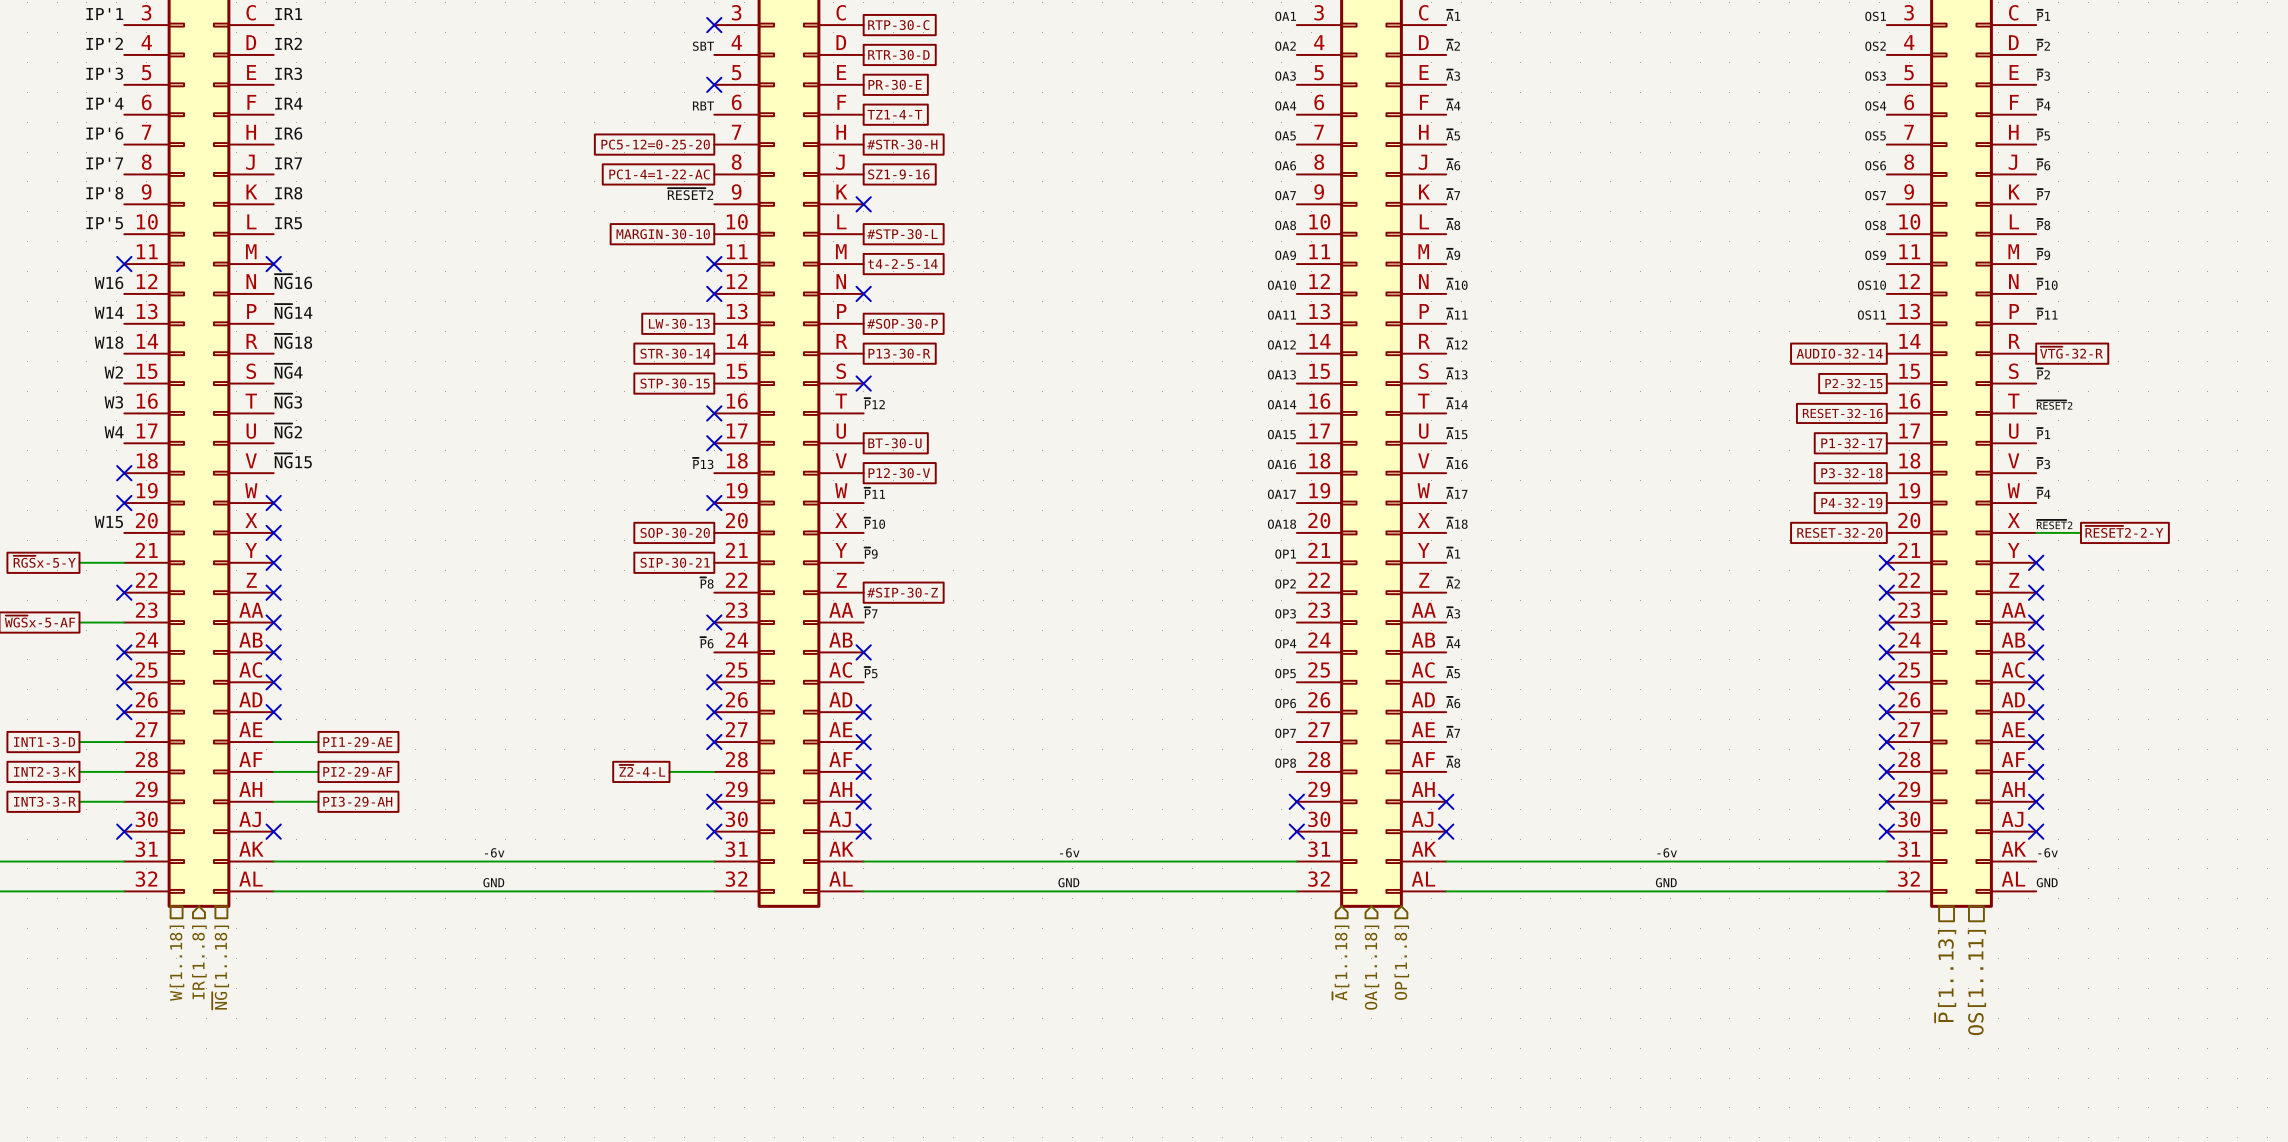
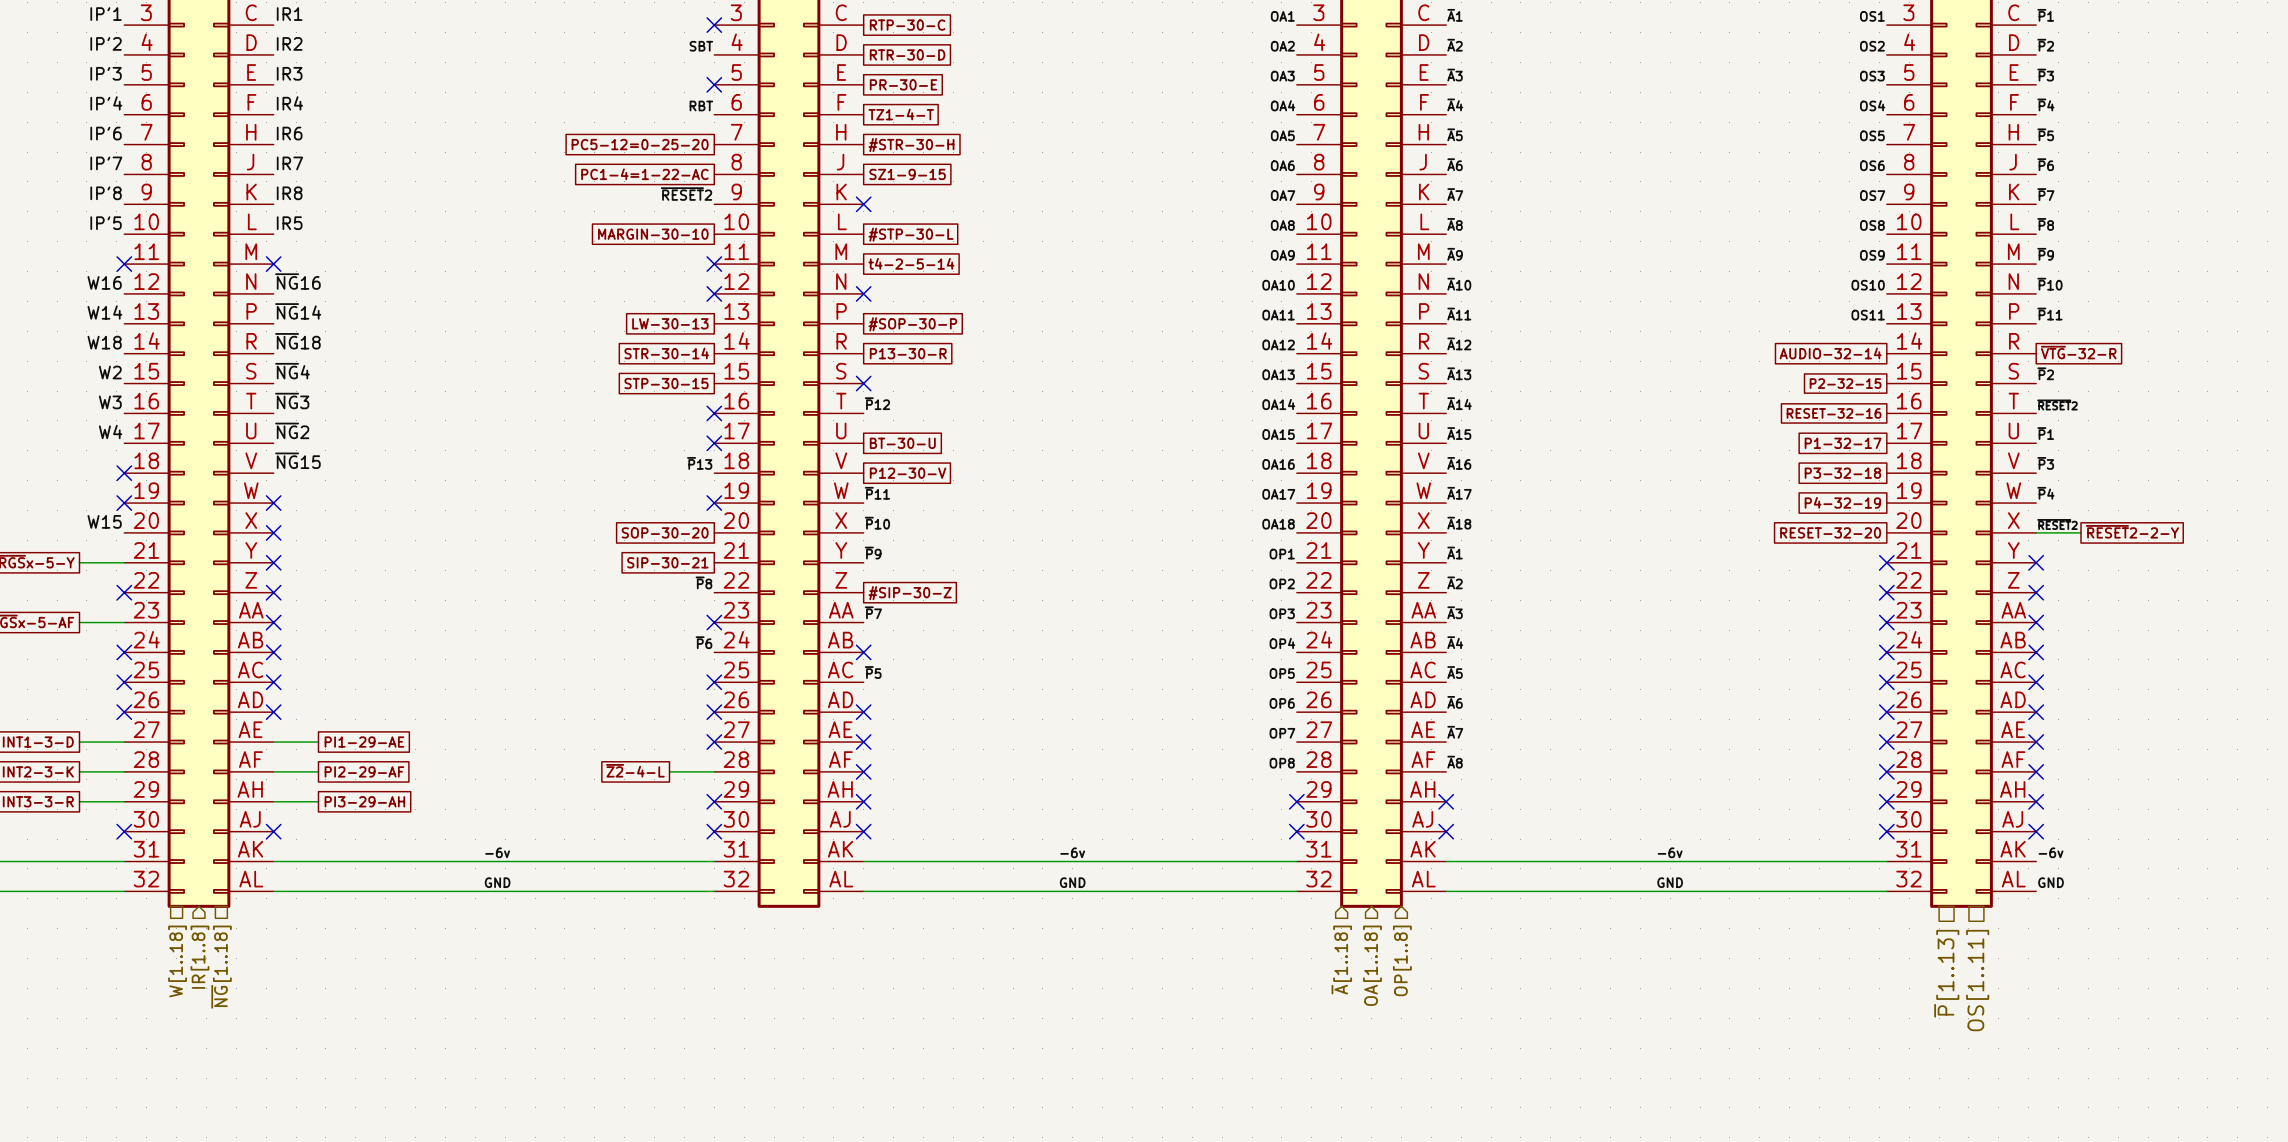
global label: SZ1-9-16 (898, 174) -> SZ1-9-15 (907, 174)

